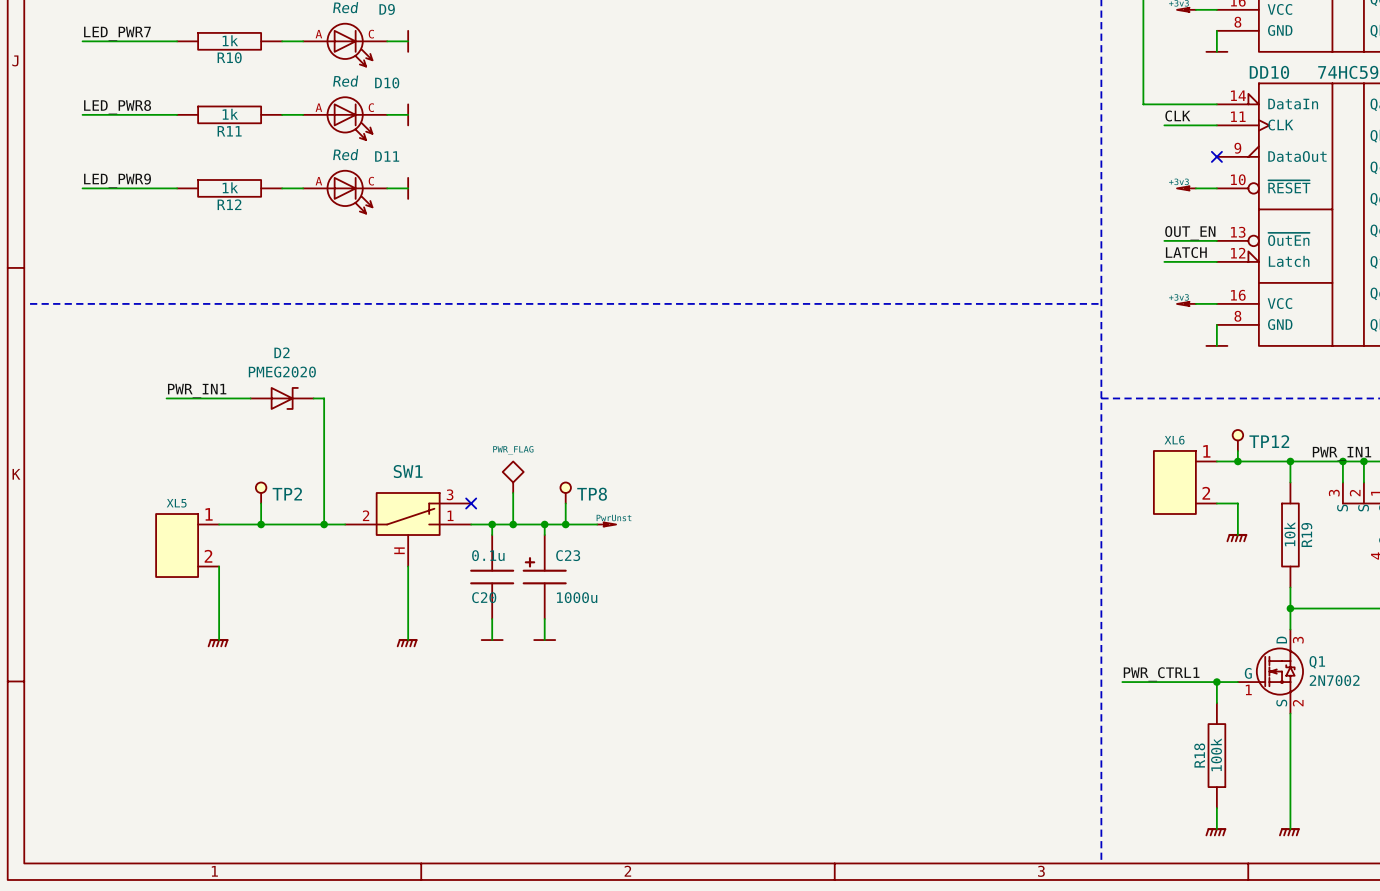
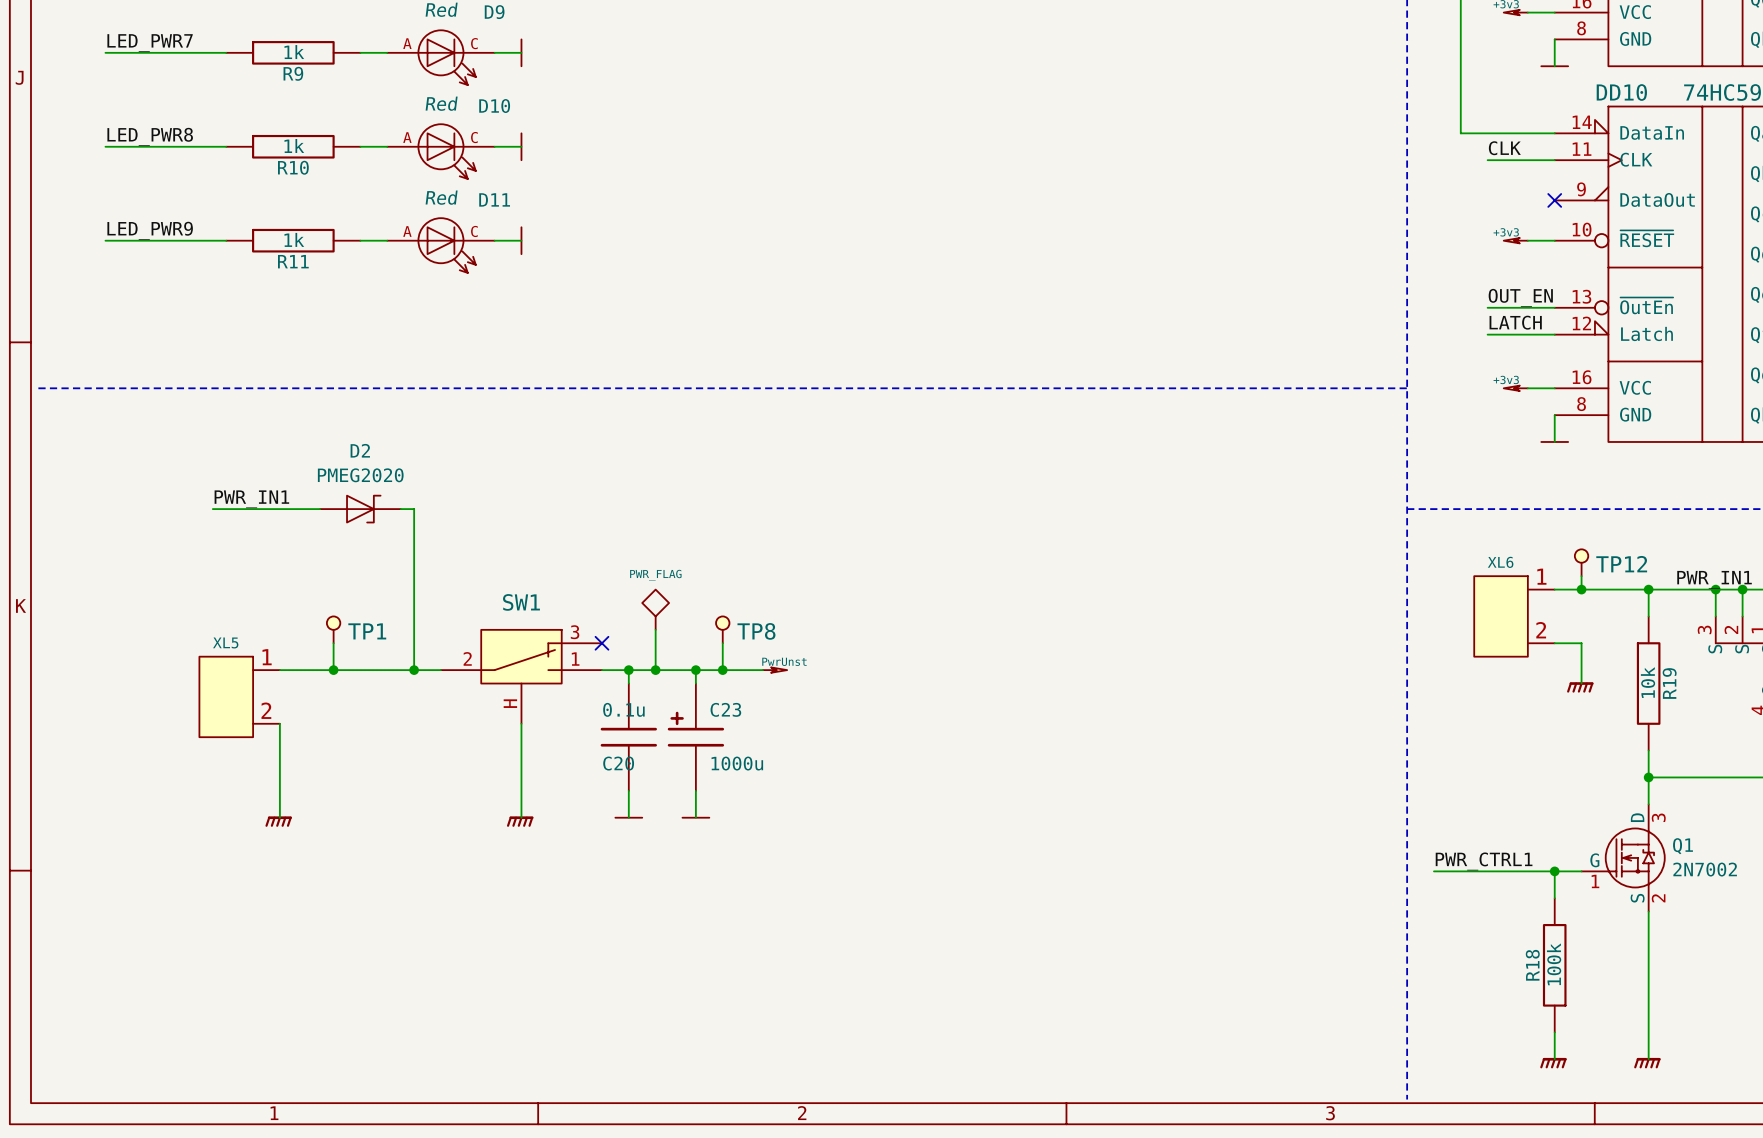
R10 name: R10 (229, 57) -> R9 (293, 73)
R11 name: R11 (229, 131) -> R10 (293, 167)
R12 name: R12 (229, 204) -> R11 (293, 261)
TP2 name: TP2 (287, 494) -> TP1 (367, 631)

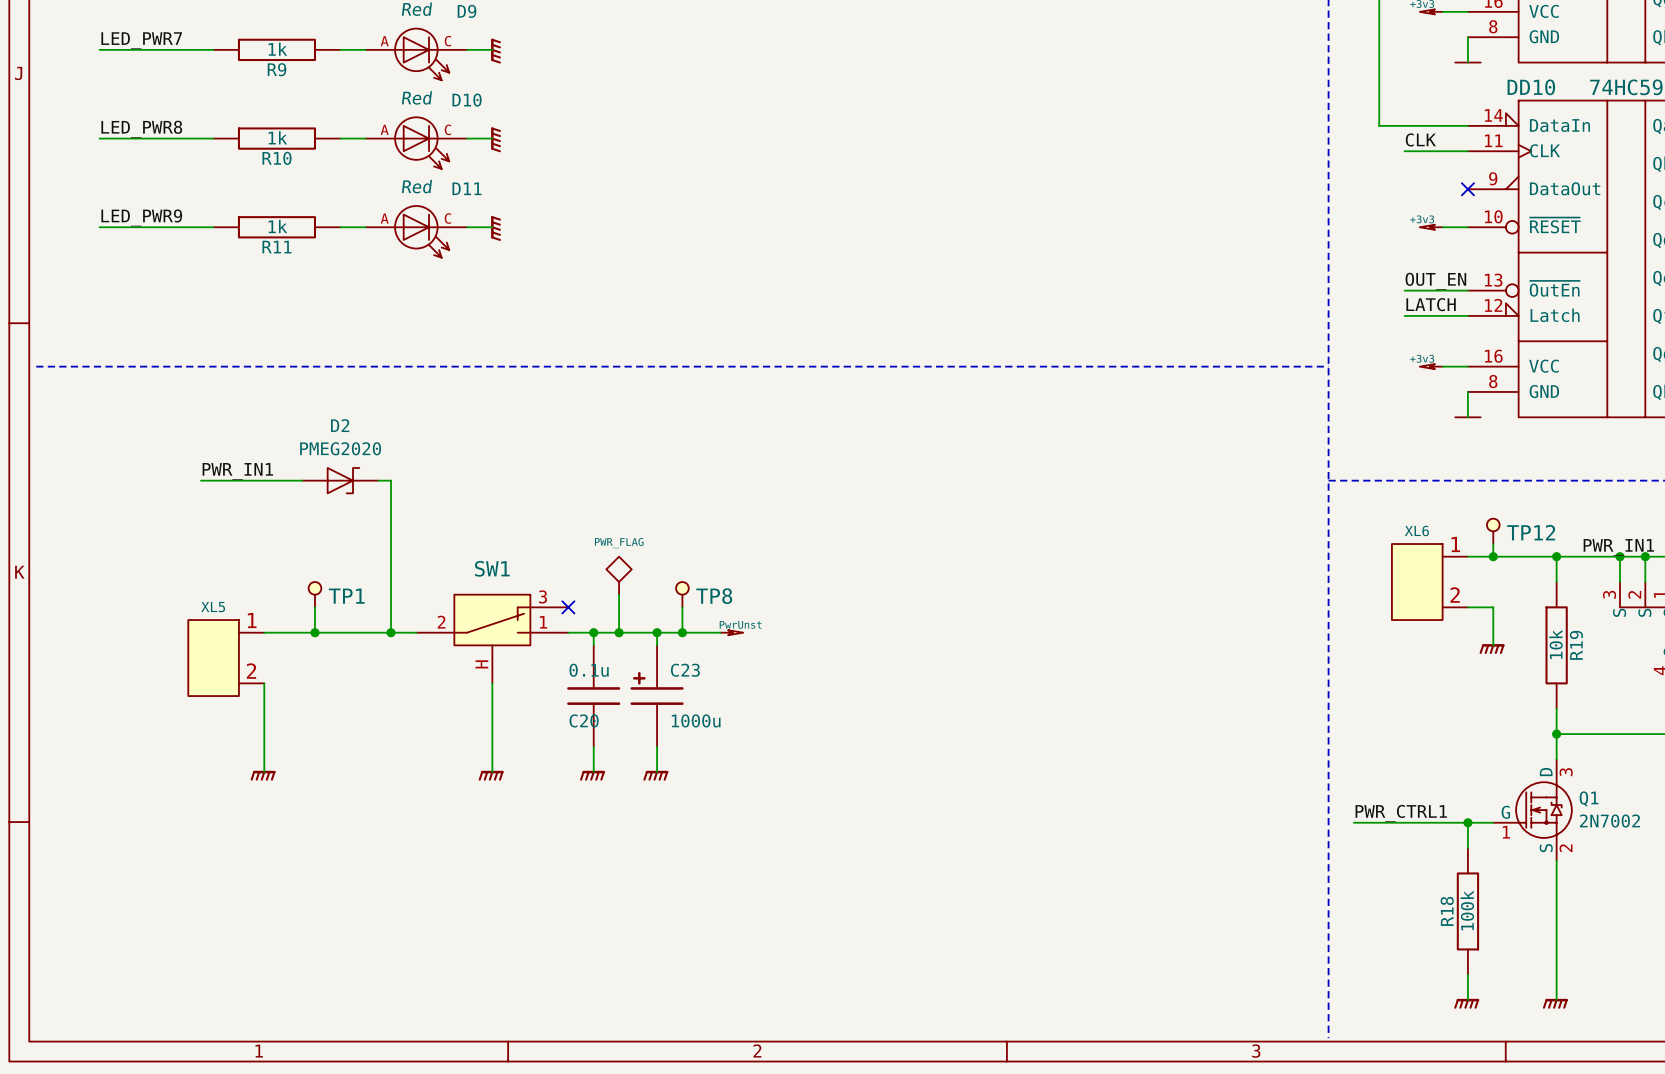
power symbol shape: [520, 38, 523, 67] -> [491, 38, 501, 64]
power symbol shape: [520, 132, 523, 161] -> [491, 127, 501, 153]
power symbol shape: [520, 226, 523, 255] -> [491, 215, 501, 241]
power symbol shape: [614, 817, 643, 819] -> [580, 770, 606, 781]
power symbol shape: [681, 817, 711, 819] -> [643, 770, 669, 781]

